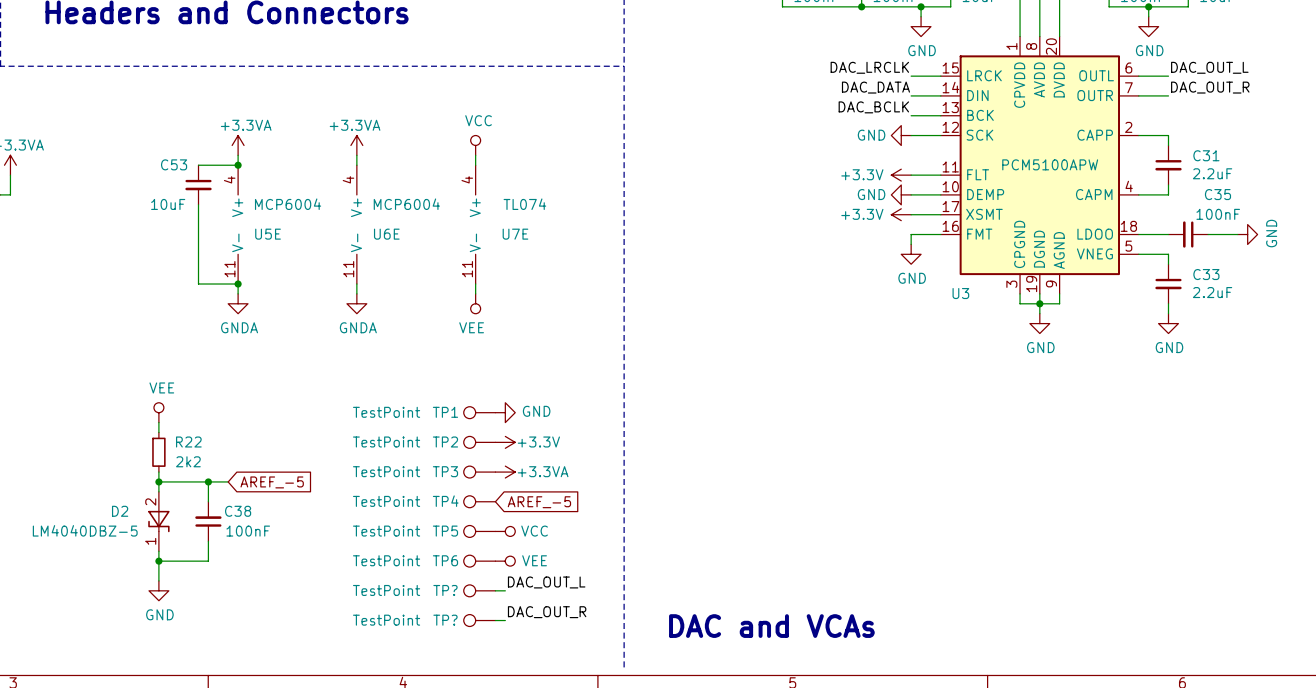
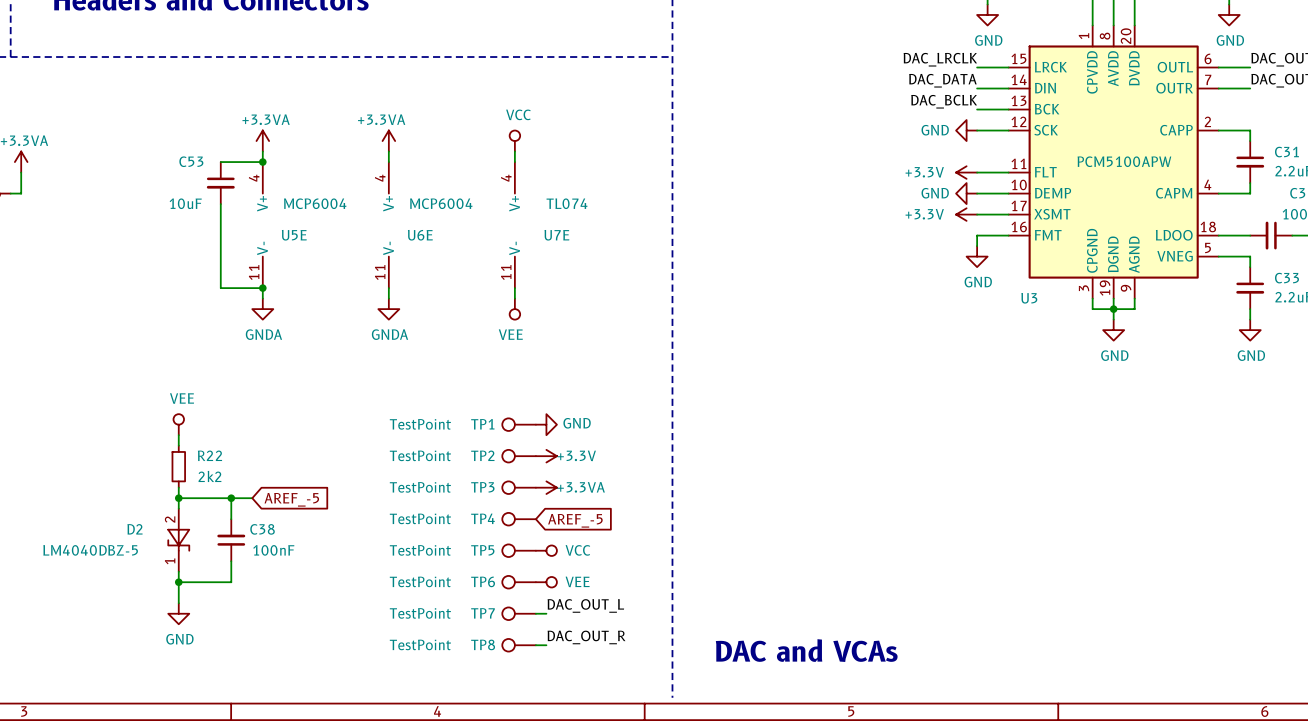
TP? name: TP? (445, 590) -> TP7 (482, 613)
TP? name: TP? (445, 620) -> TP8 (483, 644)

